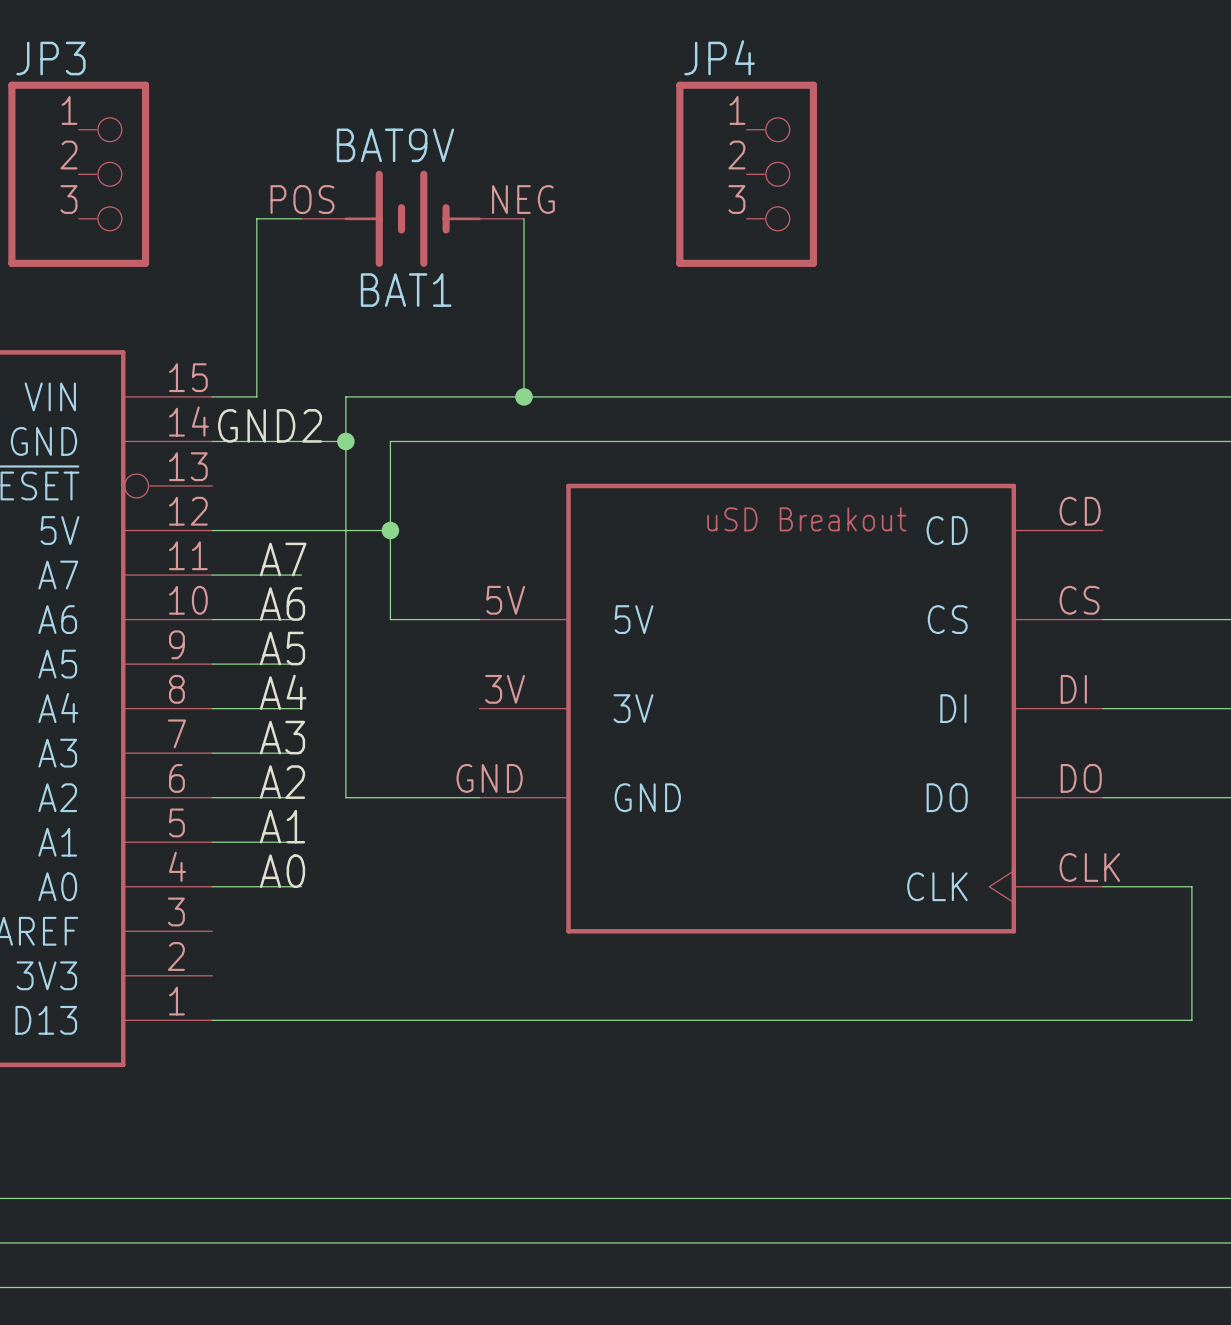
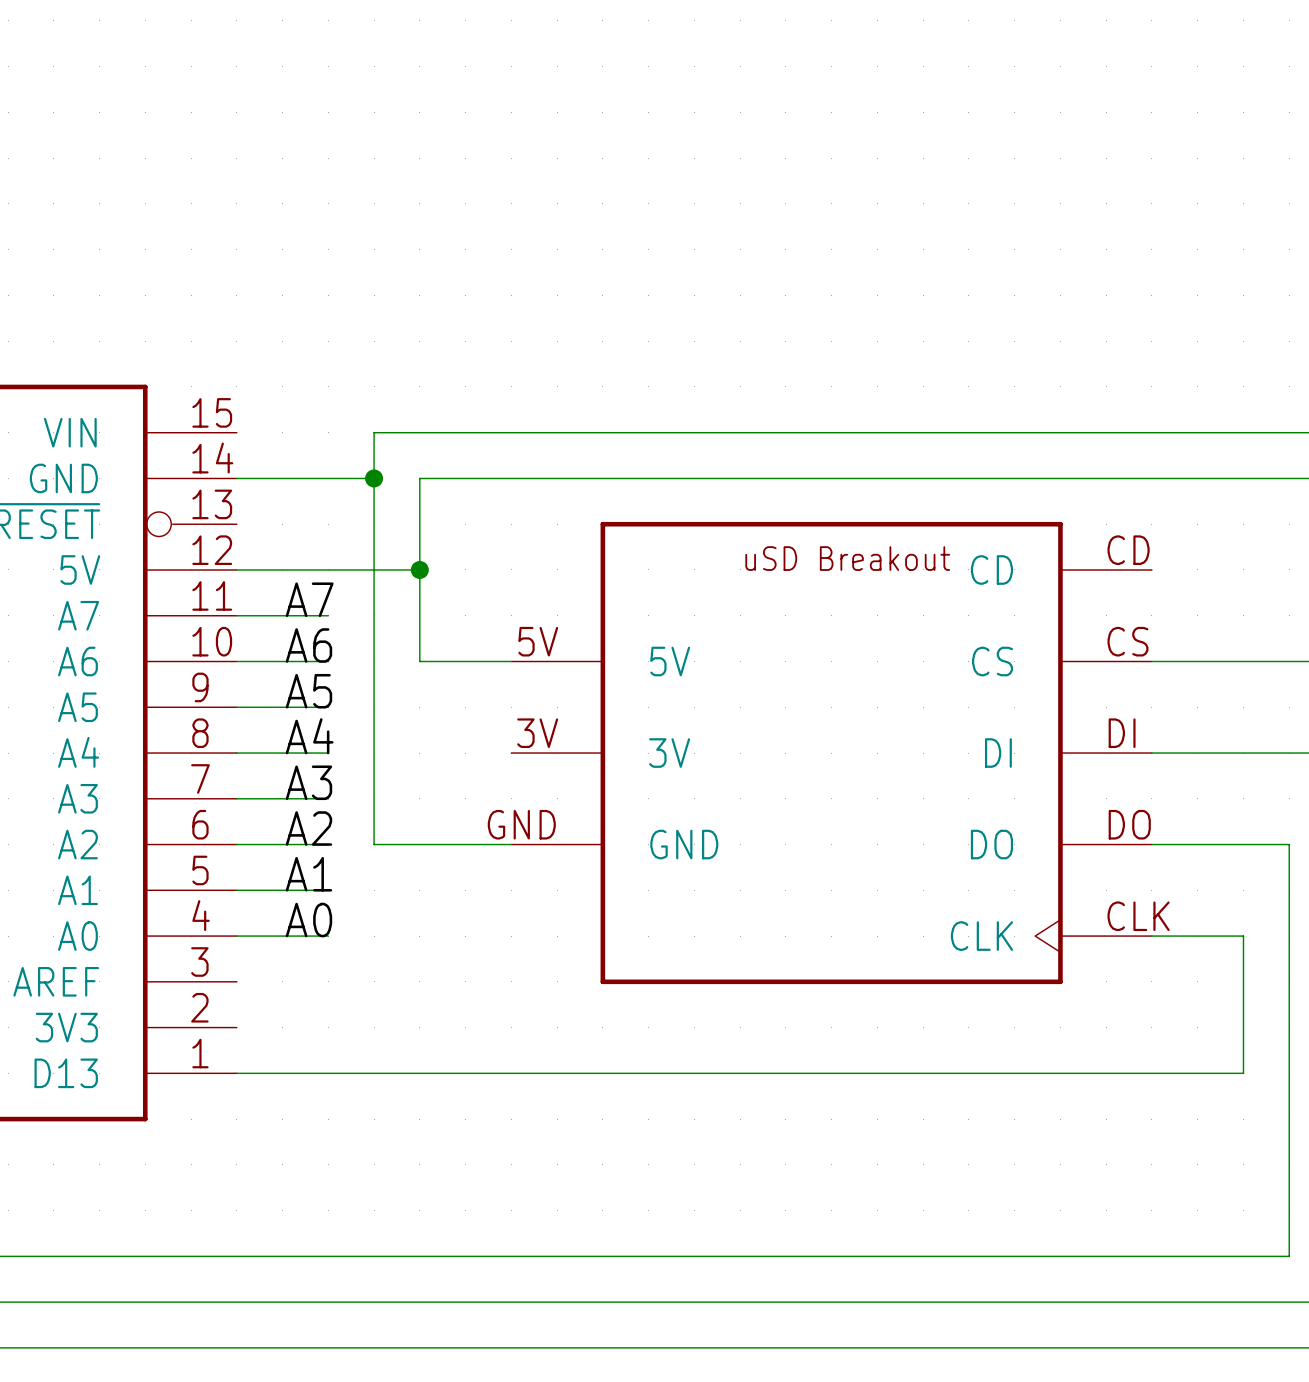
JP3: (78, 174) -> none
JP4: (746, 174) -> none
wire: (301, 218) (256, 218) (256, 396) (212, 396) -> none
BAT1: BAT9V (412, 218) -> none
wire: (523, 218) (523, 396) -> none
junction: (523, 396) -> none
label: GND2 (270, 425) -> none

